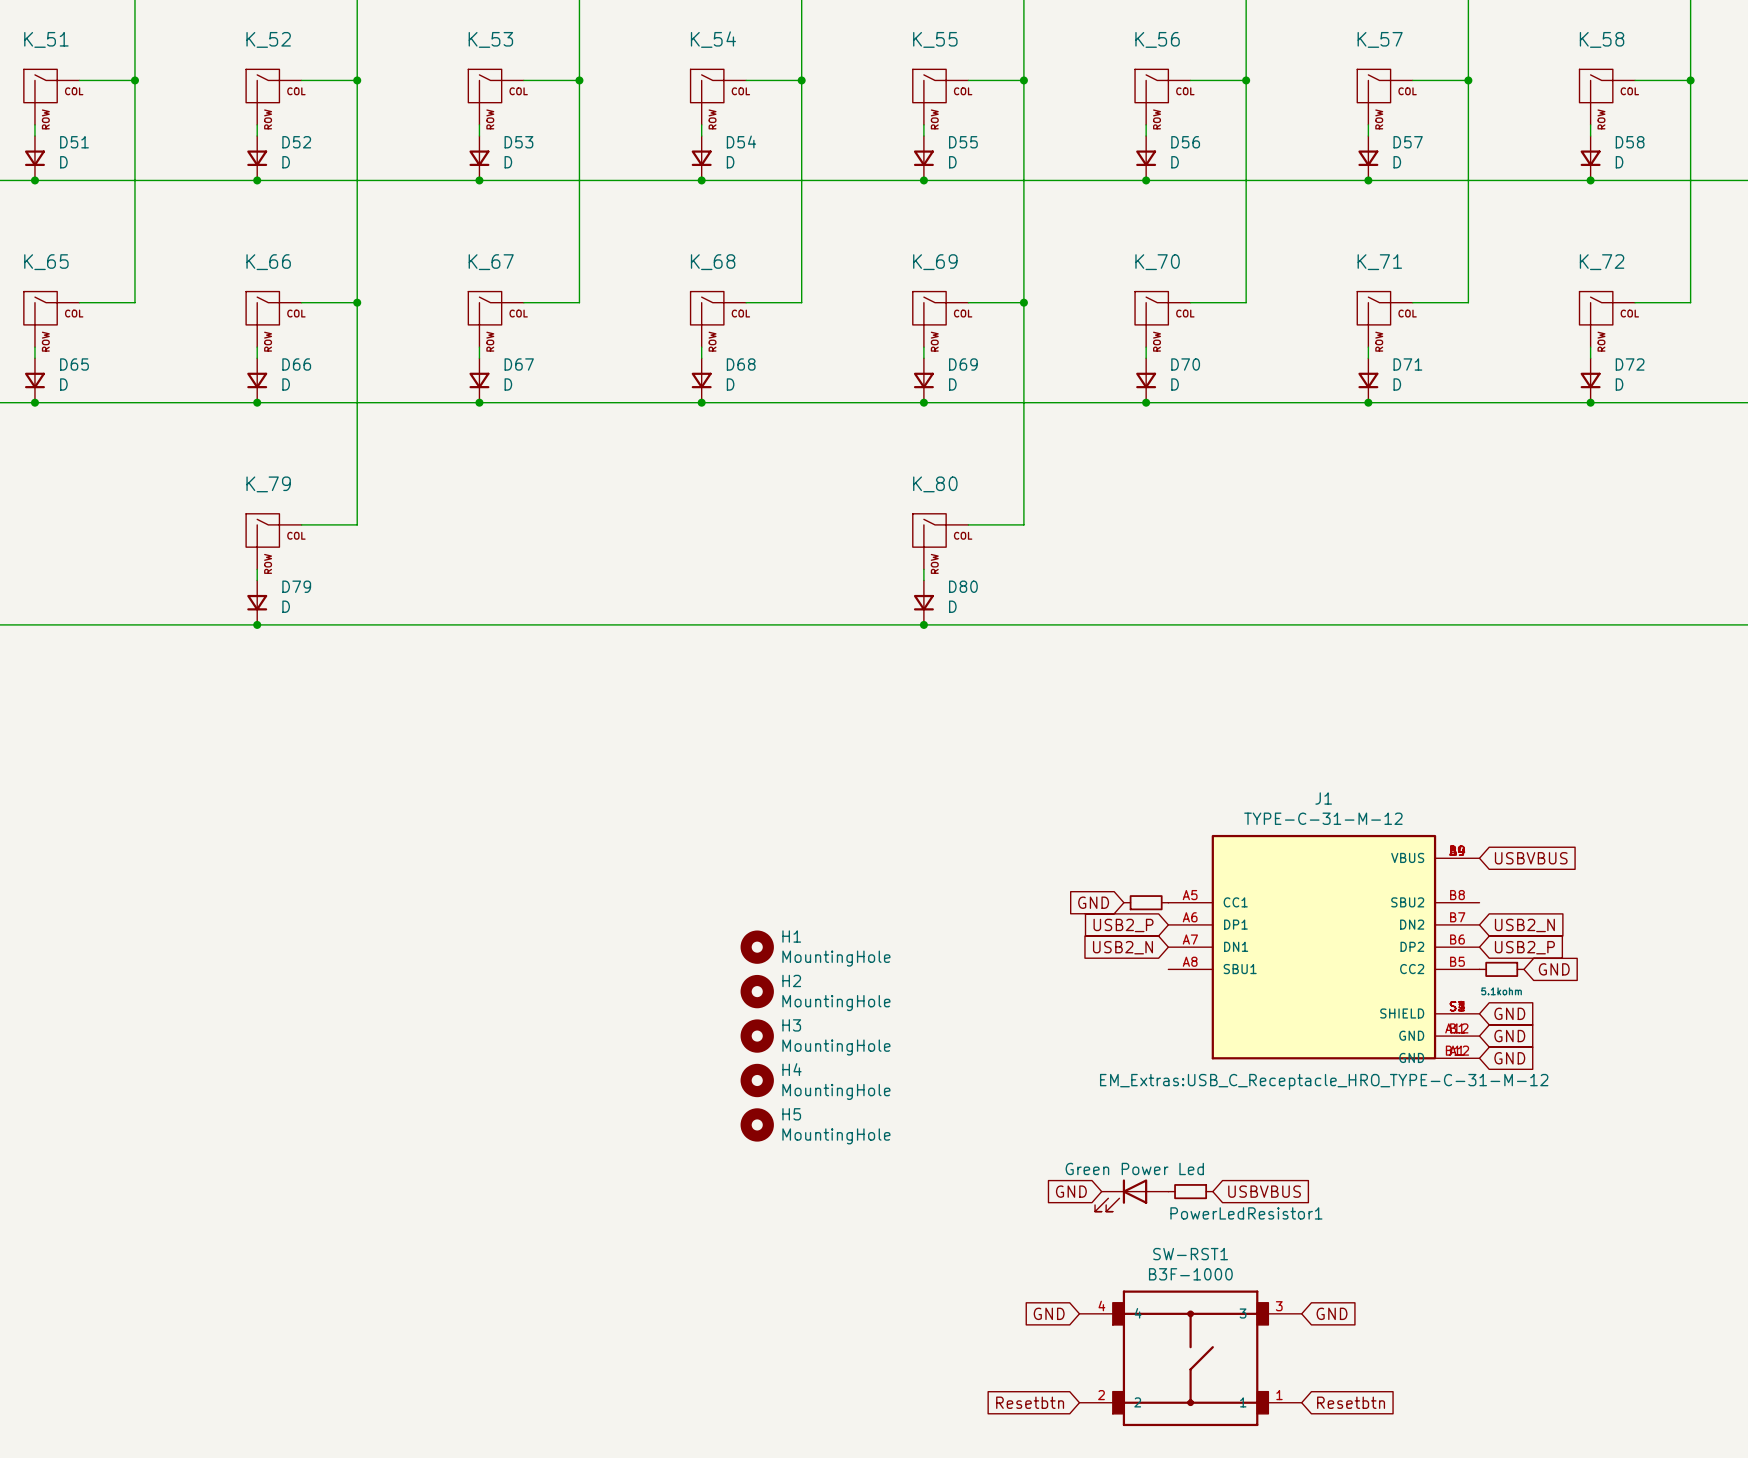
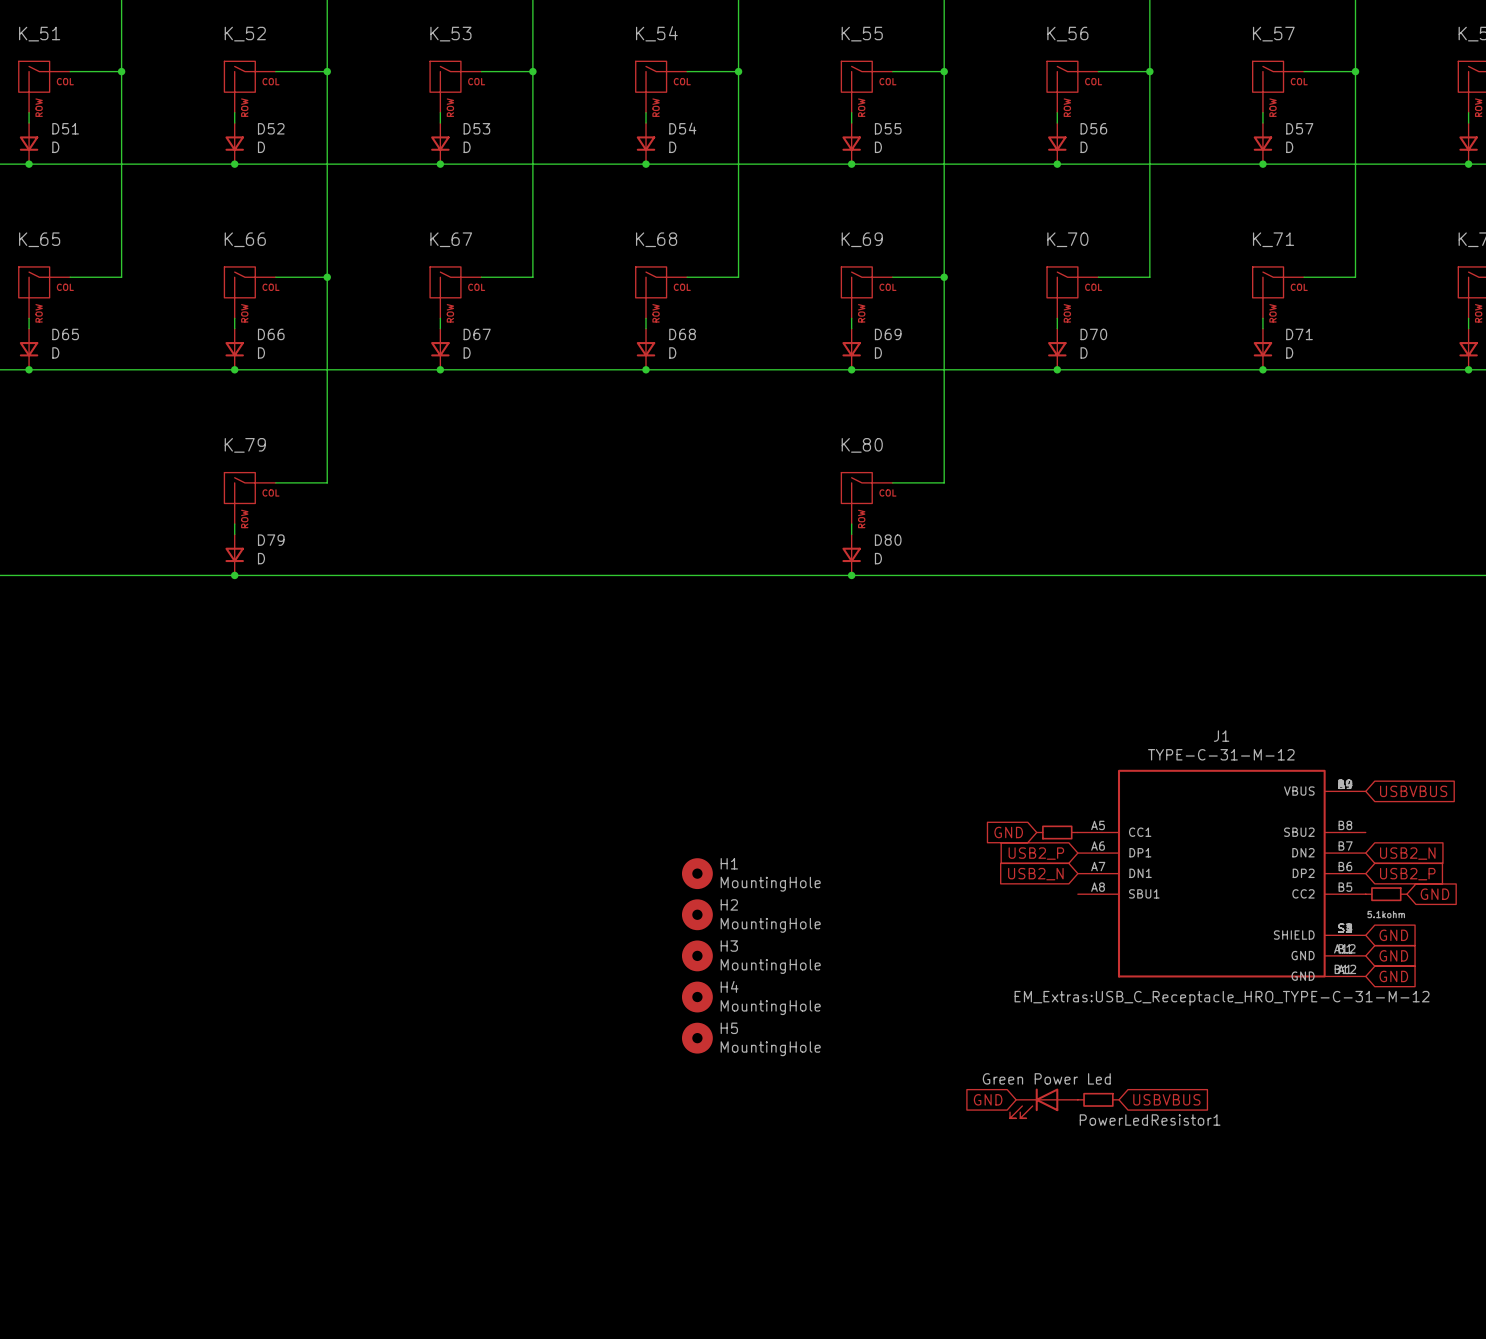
global label: GND (1049, 1313) -> none
global label: GND (1332, 1313) -> none
SW-RST1: B3F-1000 (1190, 1358) -> none
global label: Resetbtn (1030, 1402) -> none
global label: Resetbtn (1351, 1402) -> none

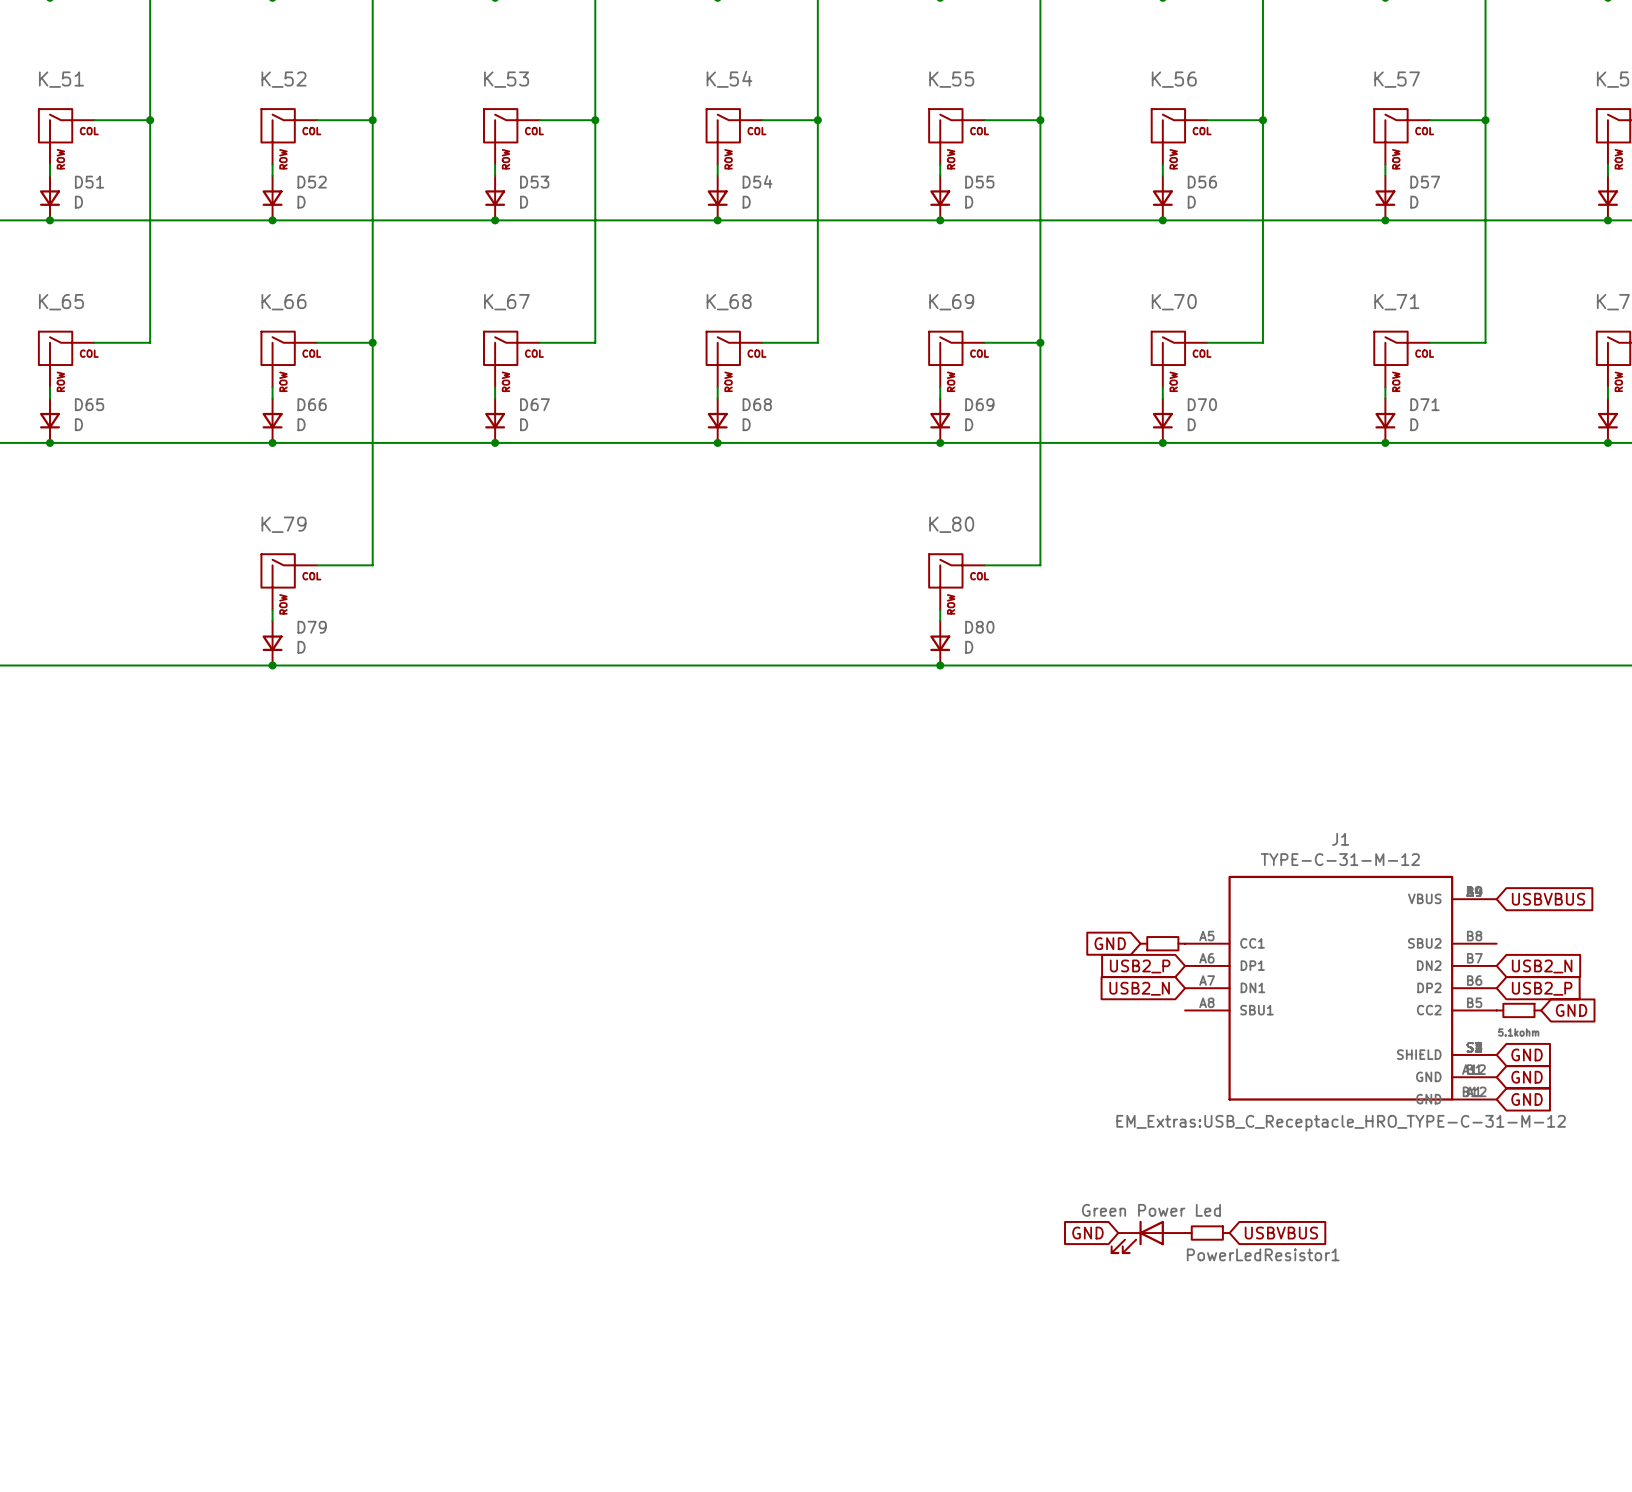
H1: MountingHole (697, 873) -> none
H2: MountingHole (697, 914) -> none
H3: MountingHole (697, 955) -> none
H4: MountingHole (697, 997) -> none
H5: MountingHole (697, 1038) -> none

